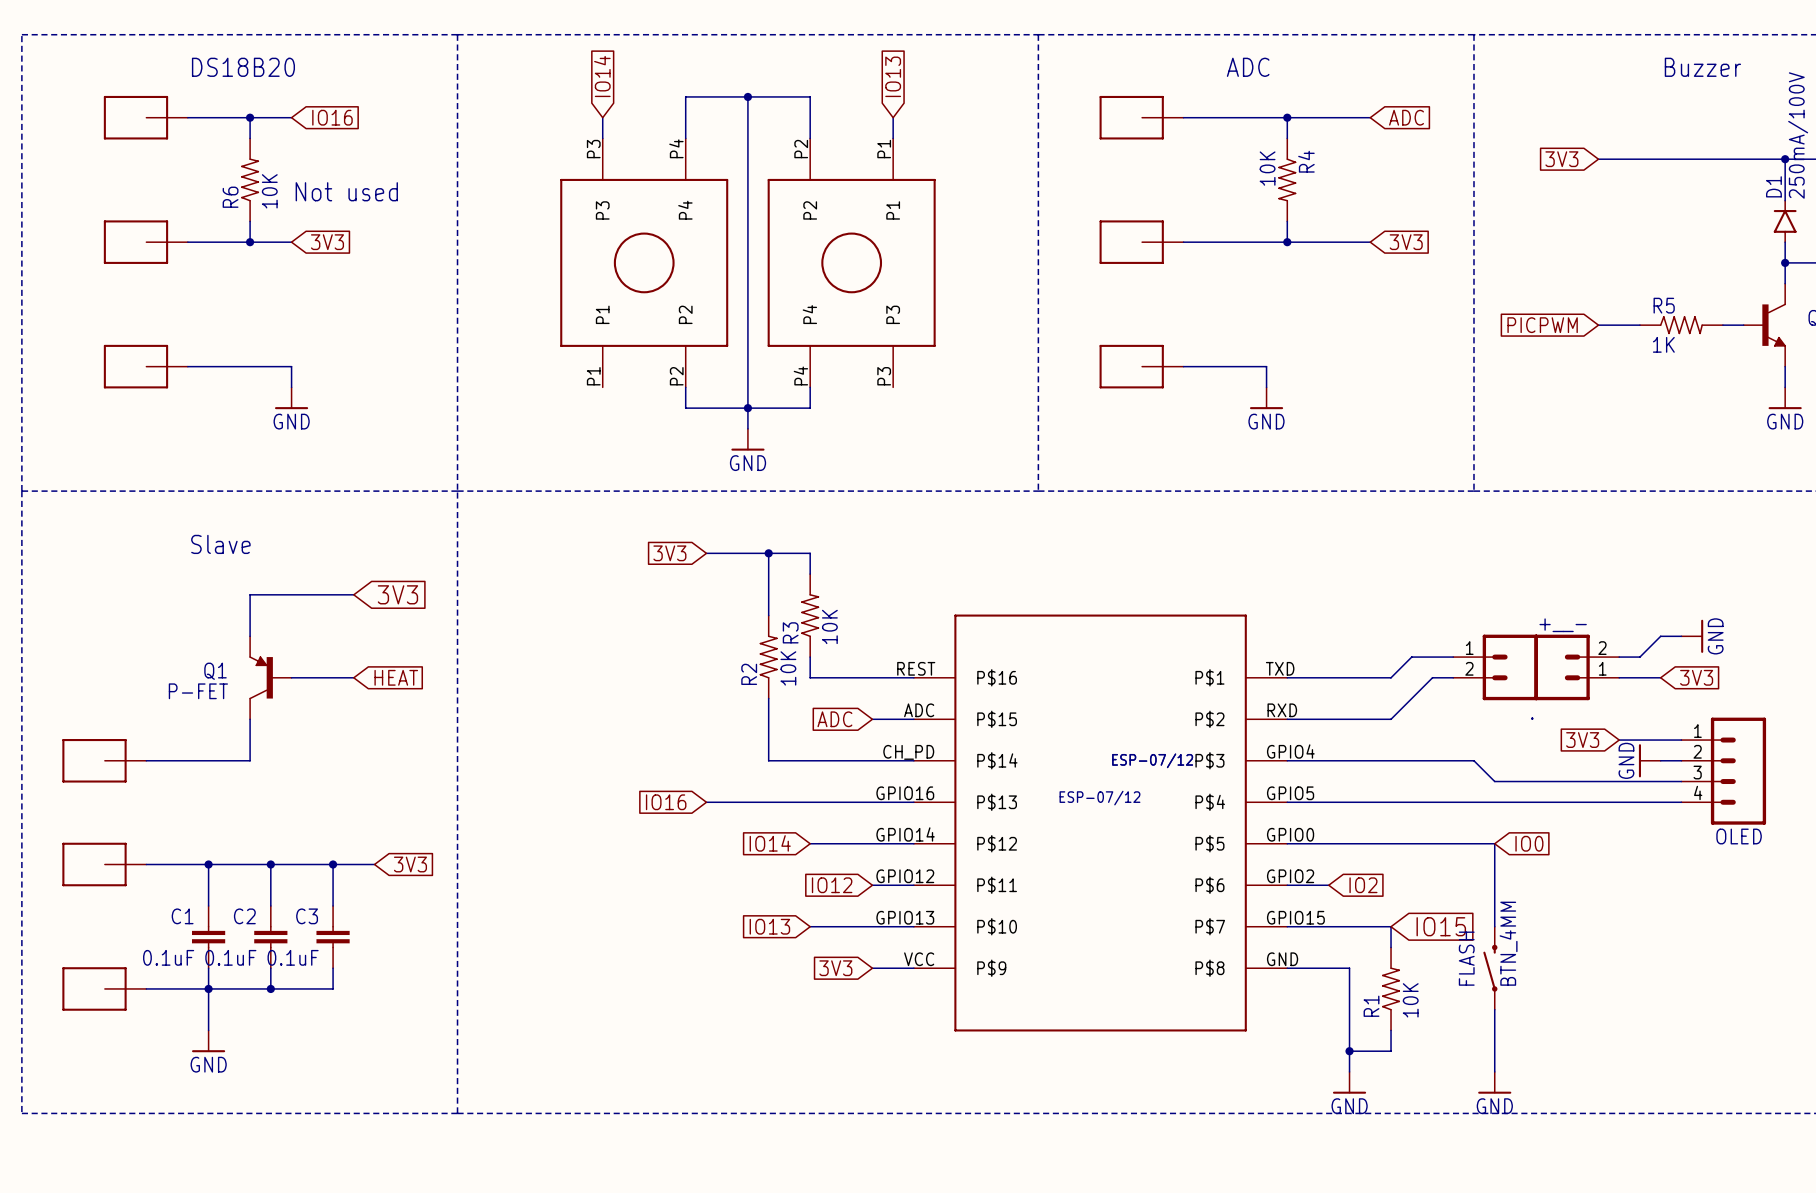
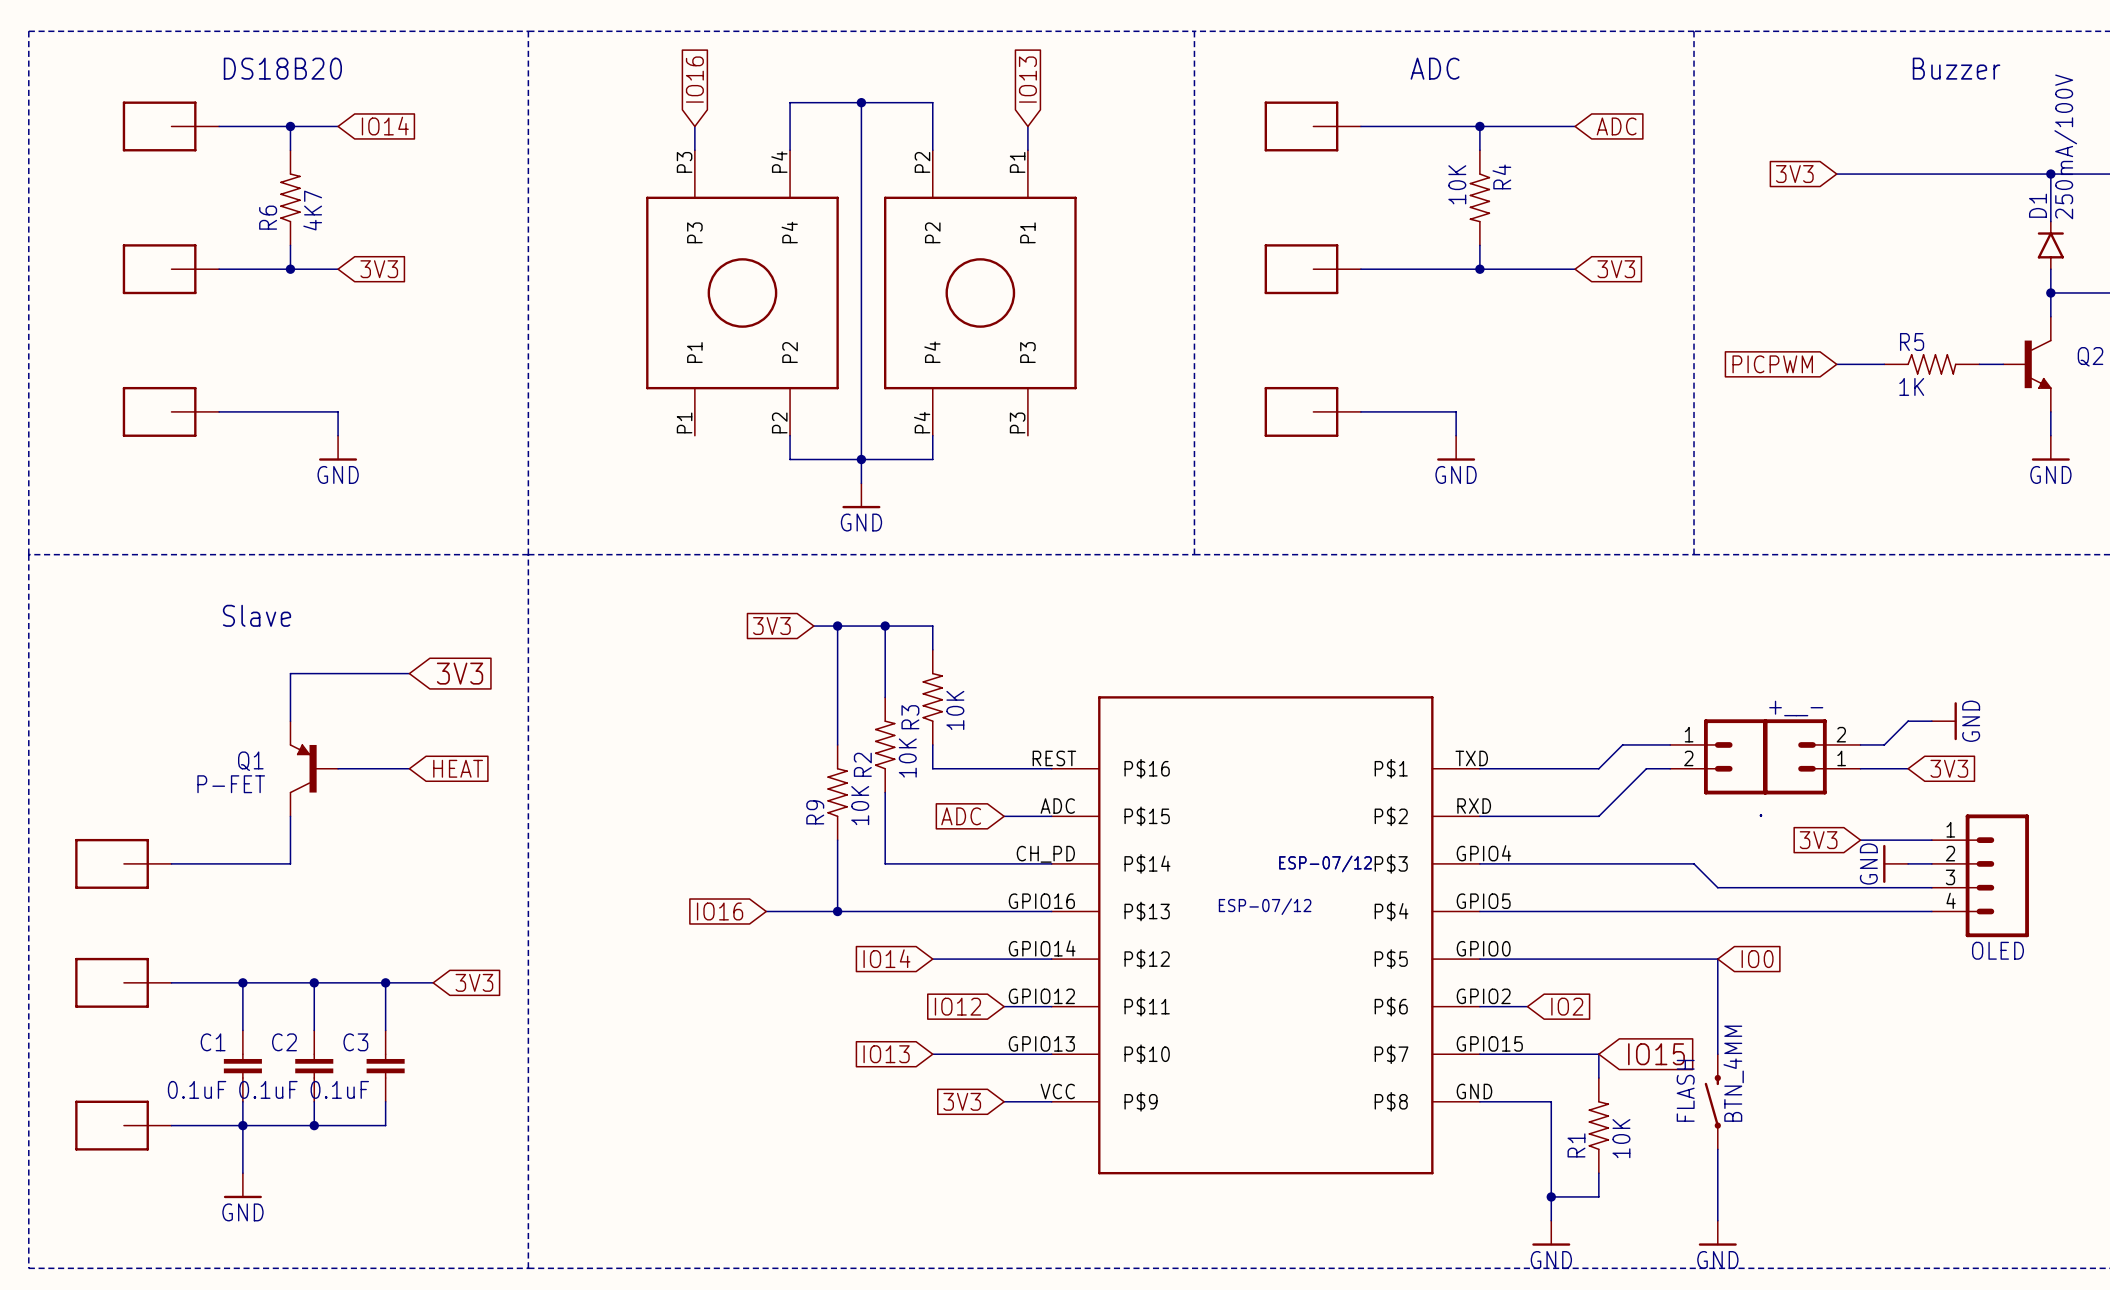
global label: IO14 (602, 76) -> IO16 (694, 79)
global label: IO16 (332, 117) -> IO14 (385, 126)
R6 value: 10K (269, 191) -> 4K7 (312, 210)
text: Not used (346, 191) -> none
wire: none -> (837, 626) (837, 744)
junction: none -> (837, 626)
R9: none -> 10K (837, 792)
wire: none -> (837, 840) (837, 911)
wire: none -> (766, 911) (813, 911)
global label position: IO16 (666, 802) -> IO16 (720, 911)
junction: none -> (837, 911)

